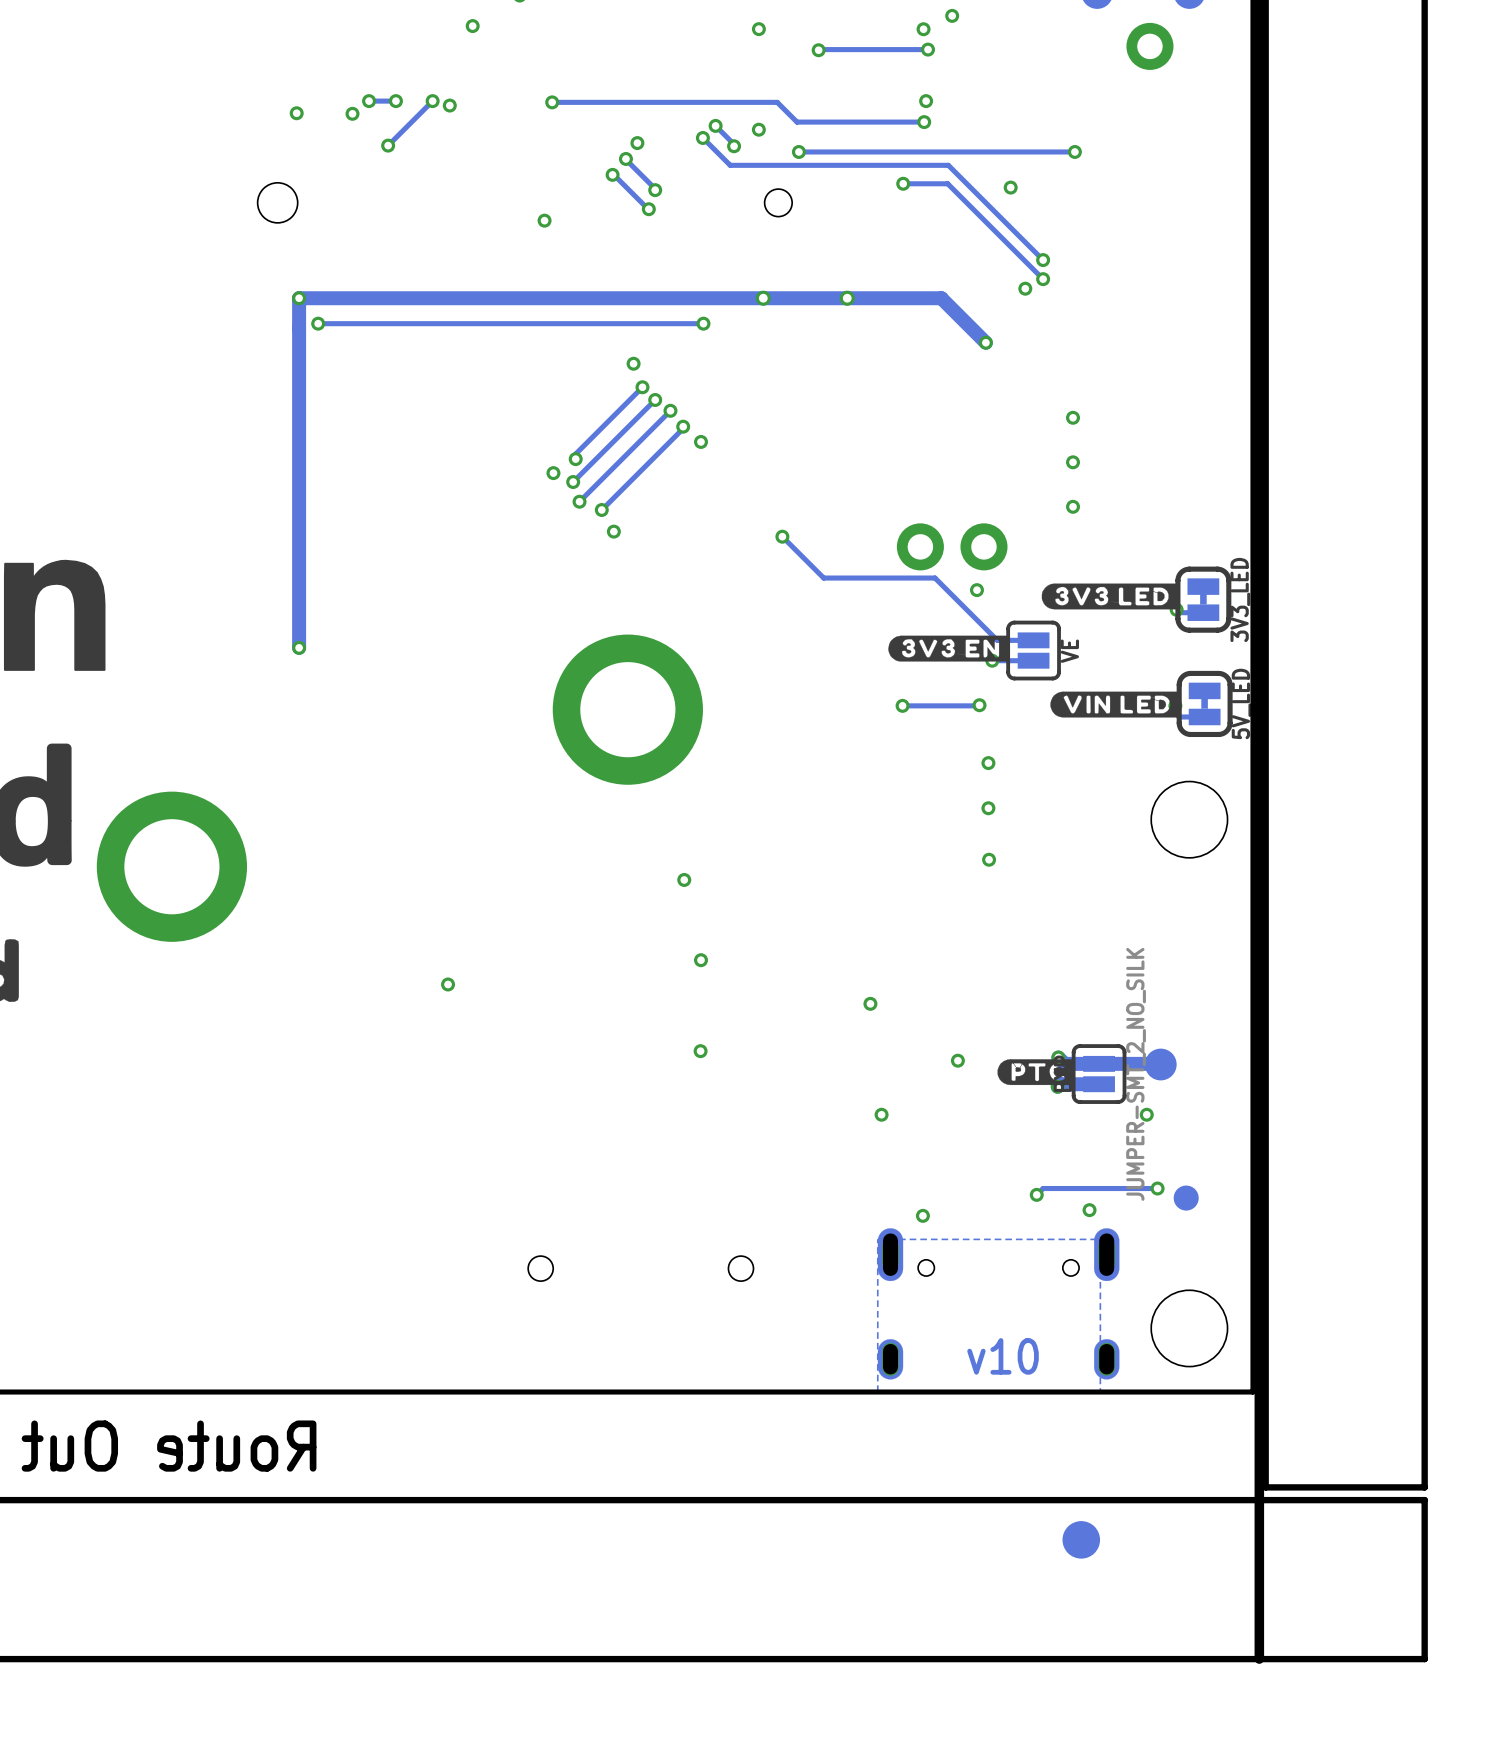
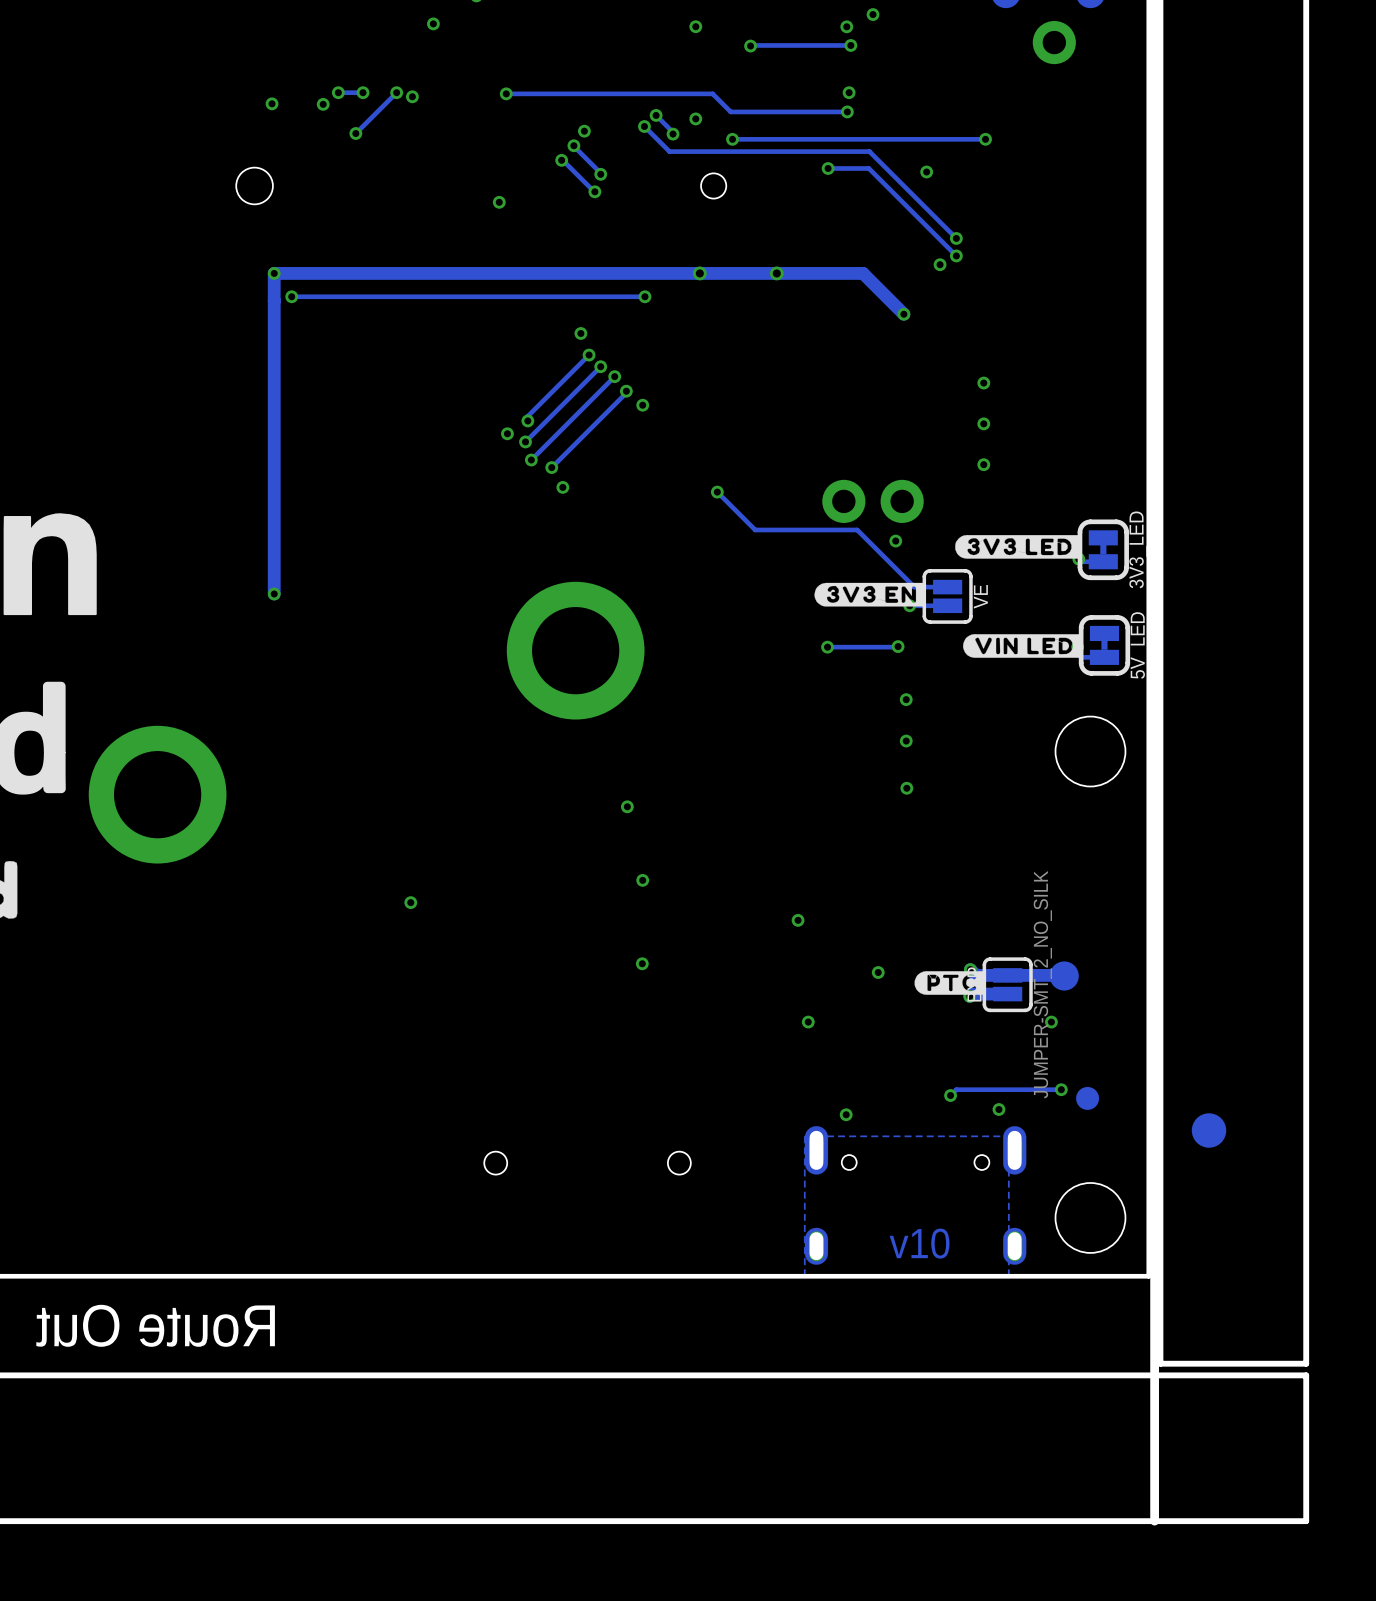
part position: (1081, 1539) -> (1209, 1130)

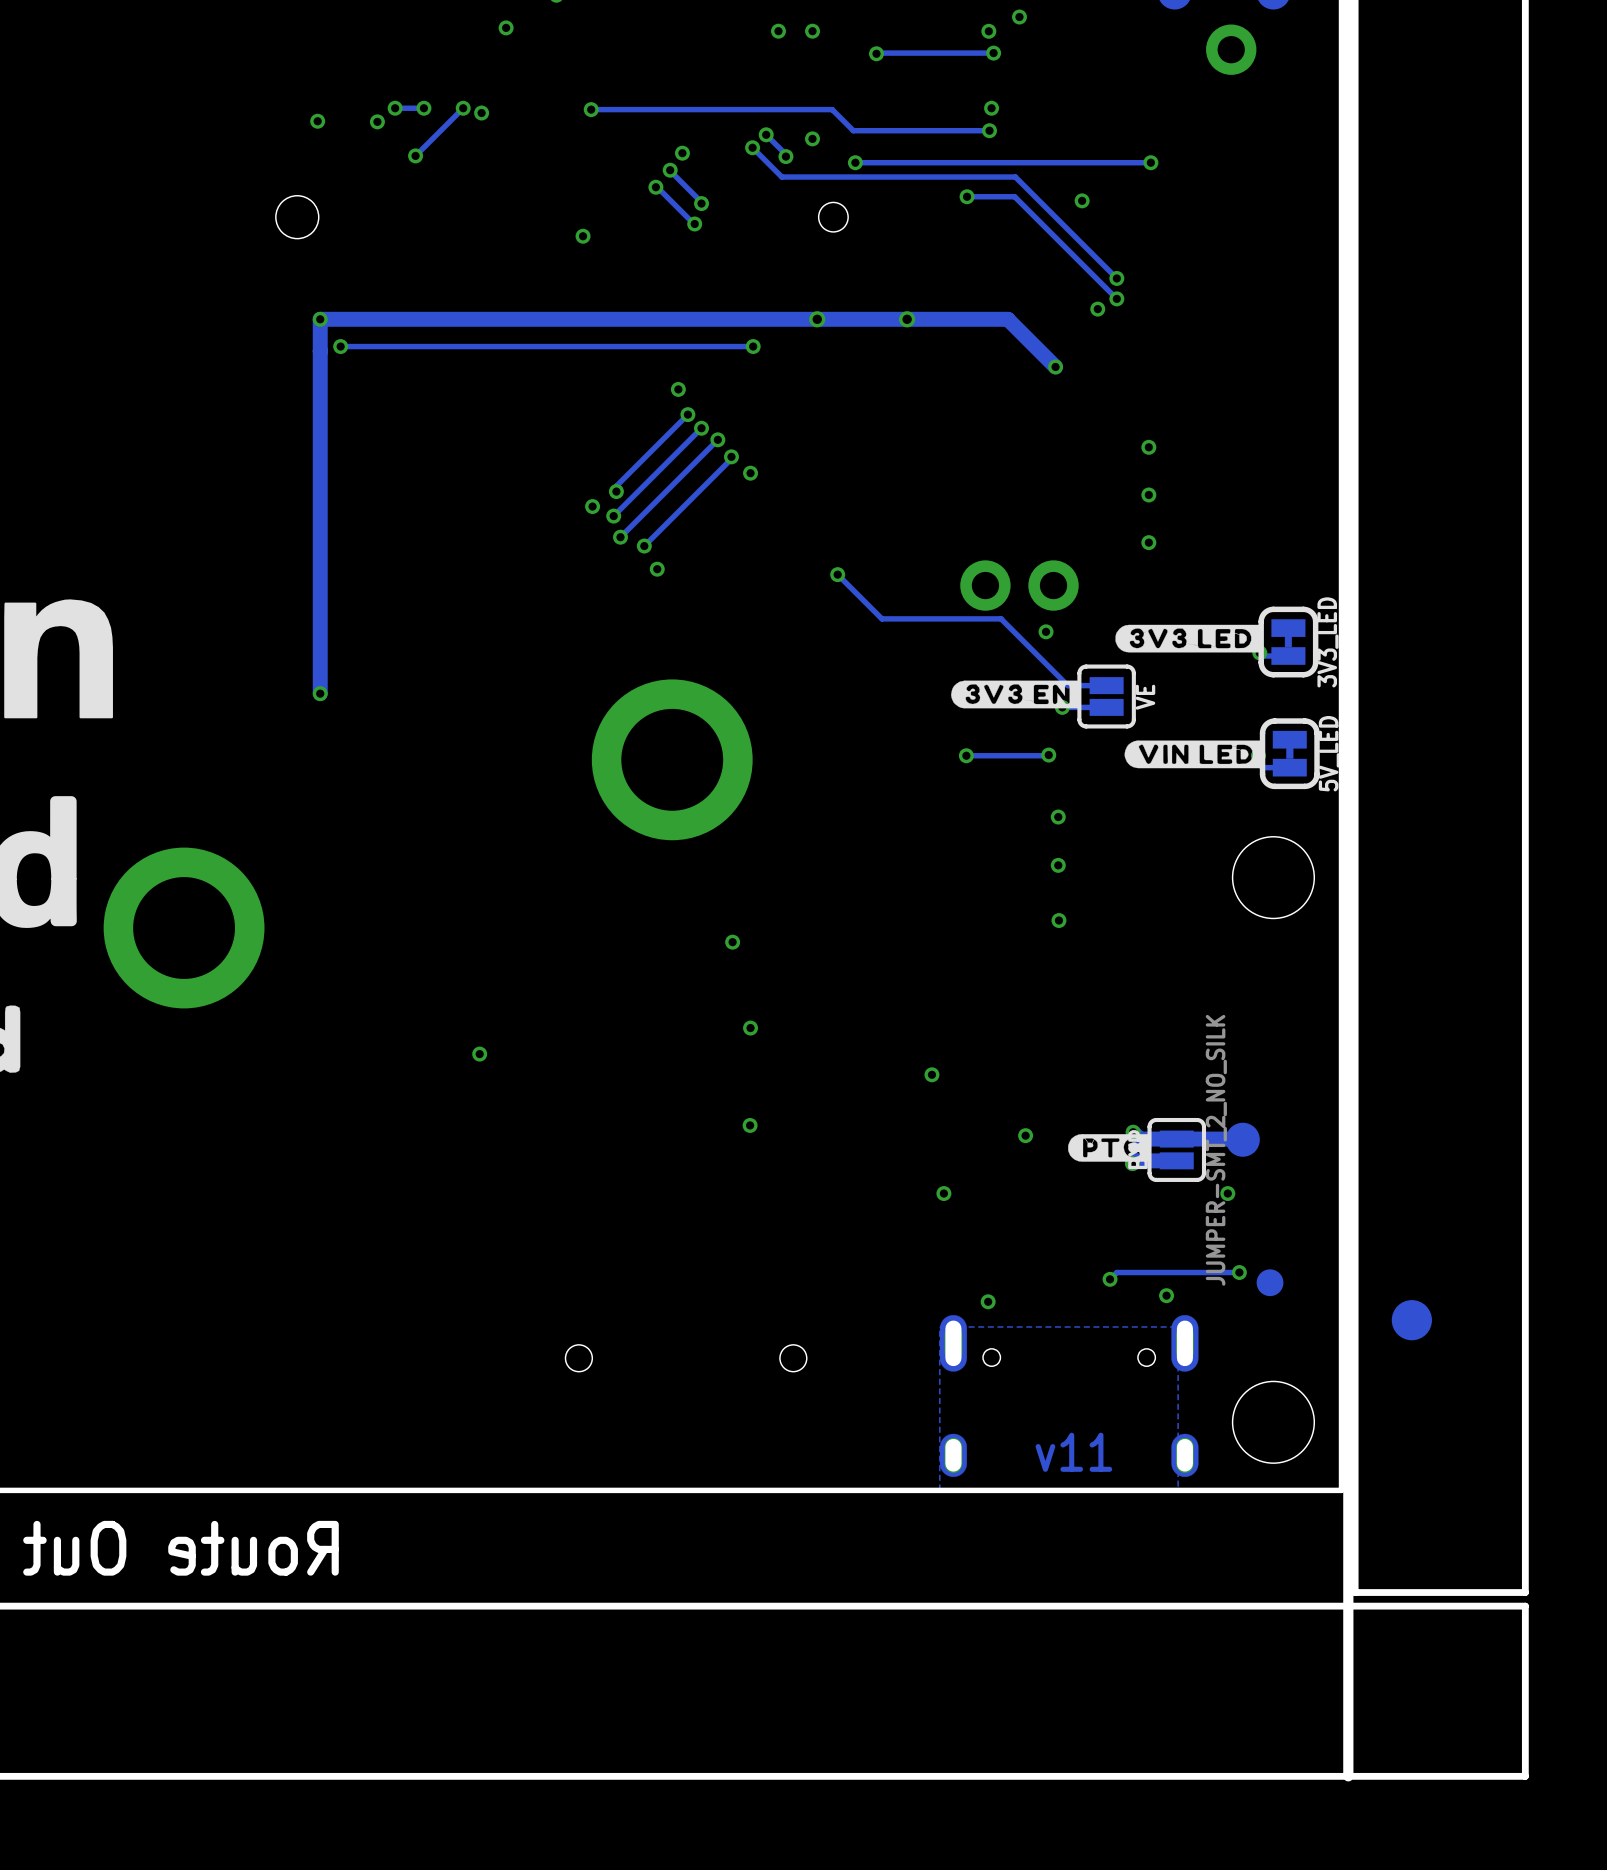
via: none -> (778, 31)
text: v10 (919, 1243) -> v11 (1073, 1452)

